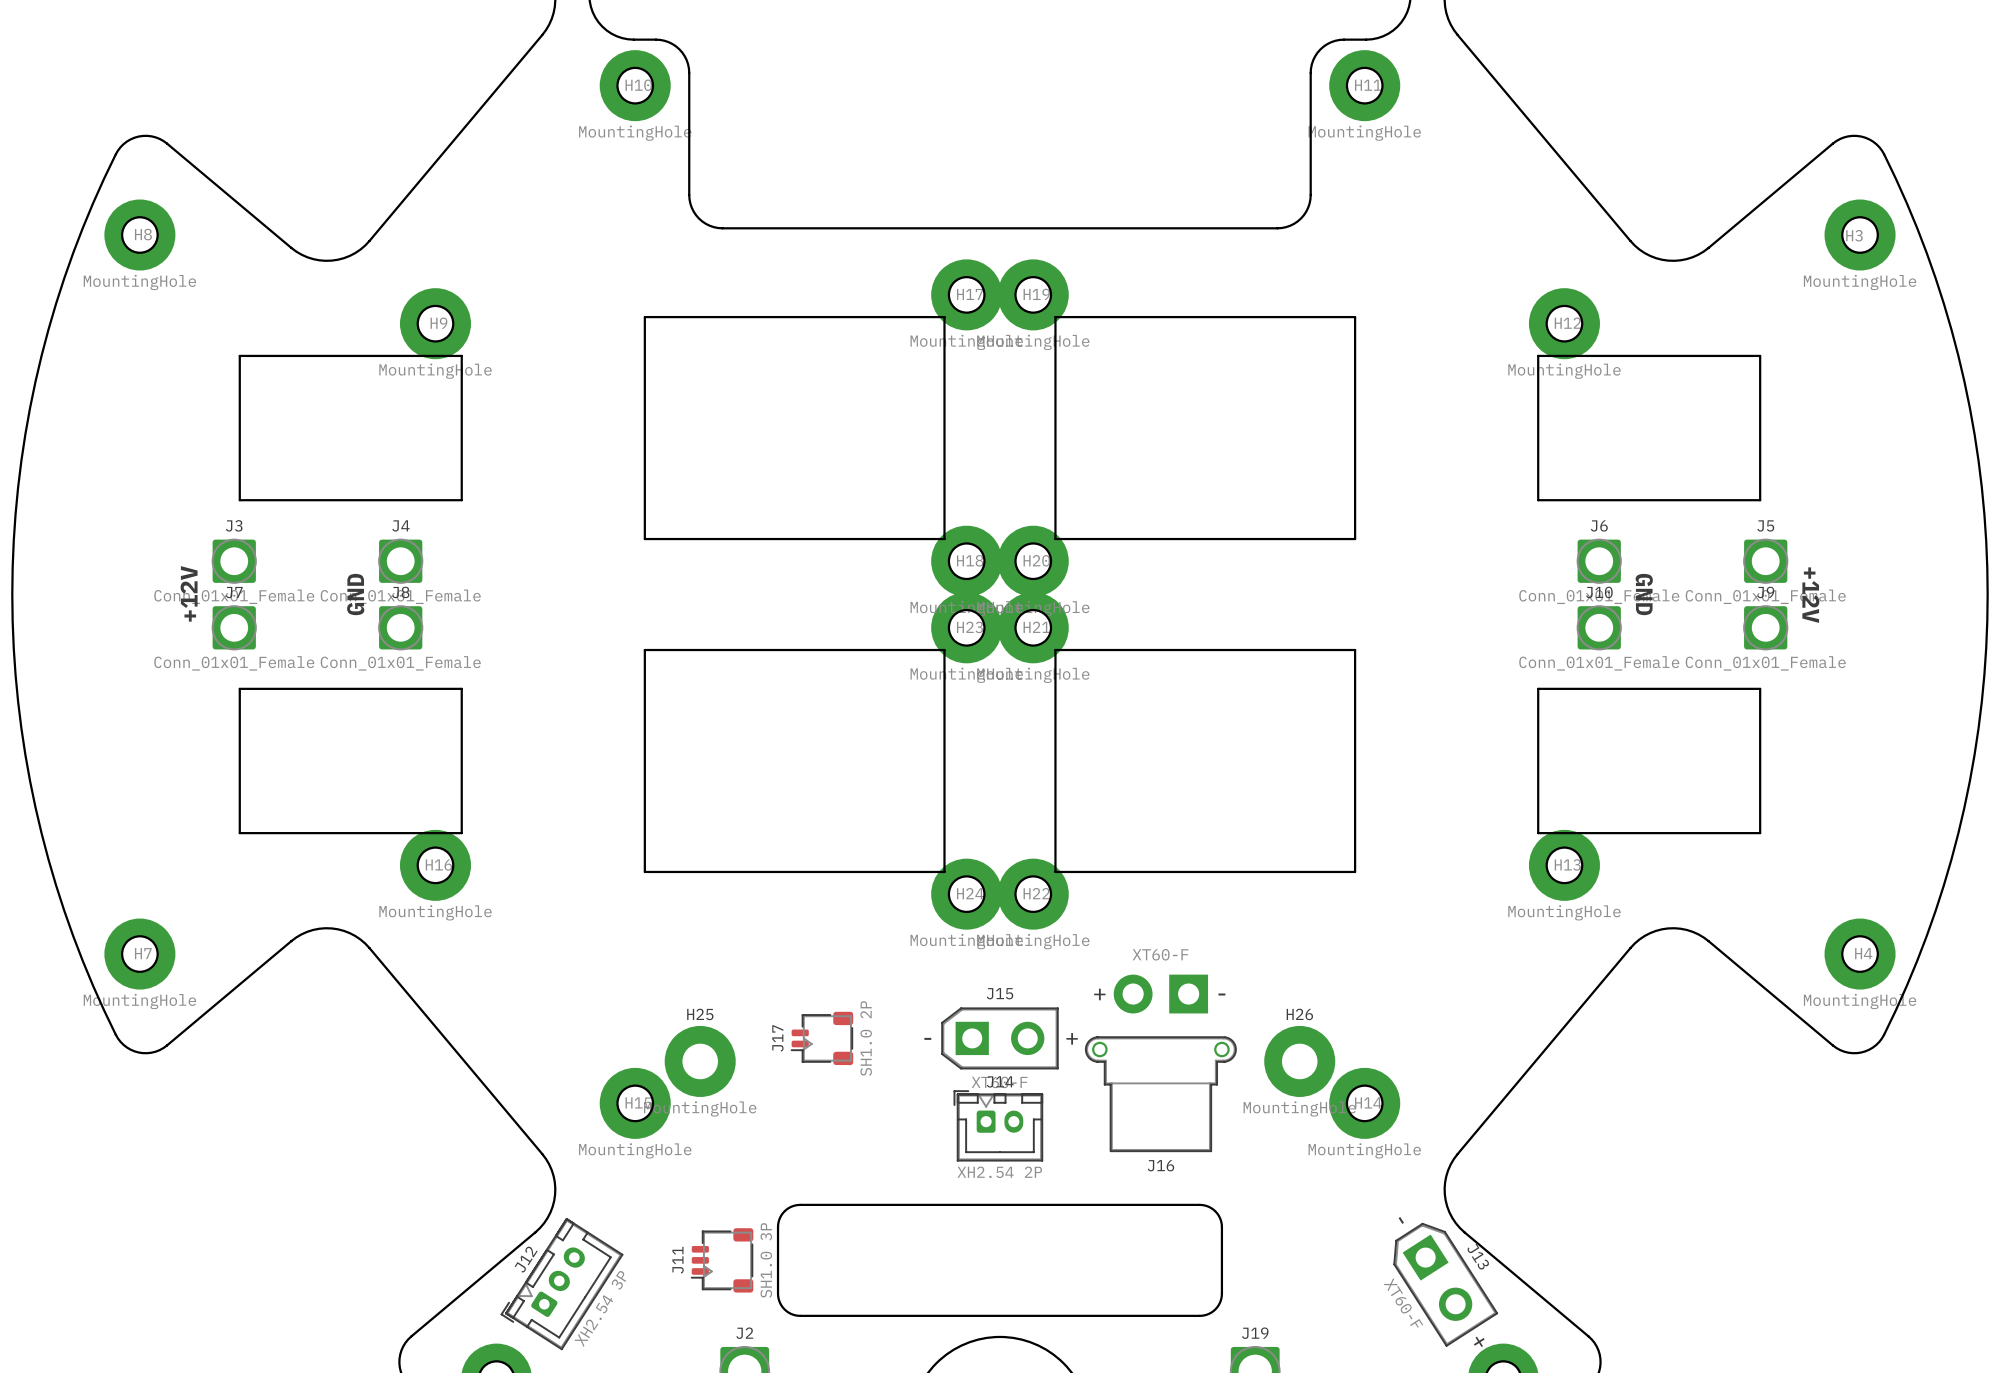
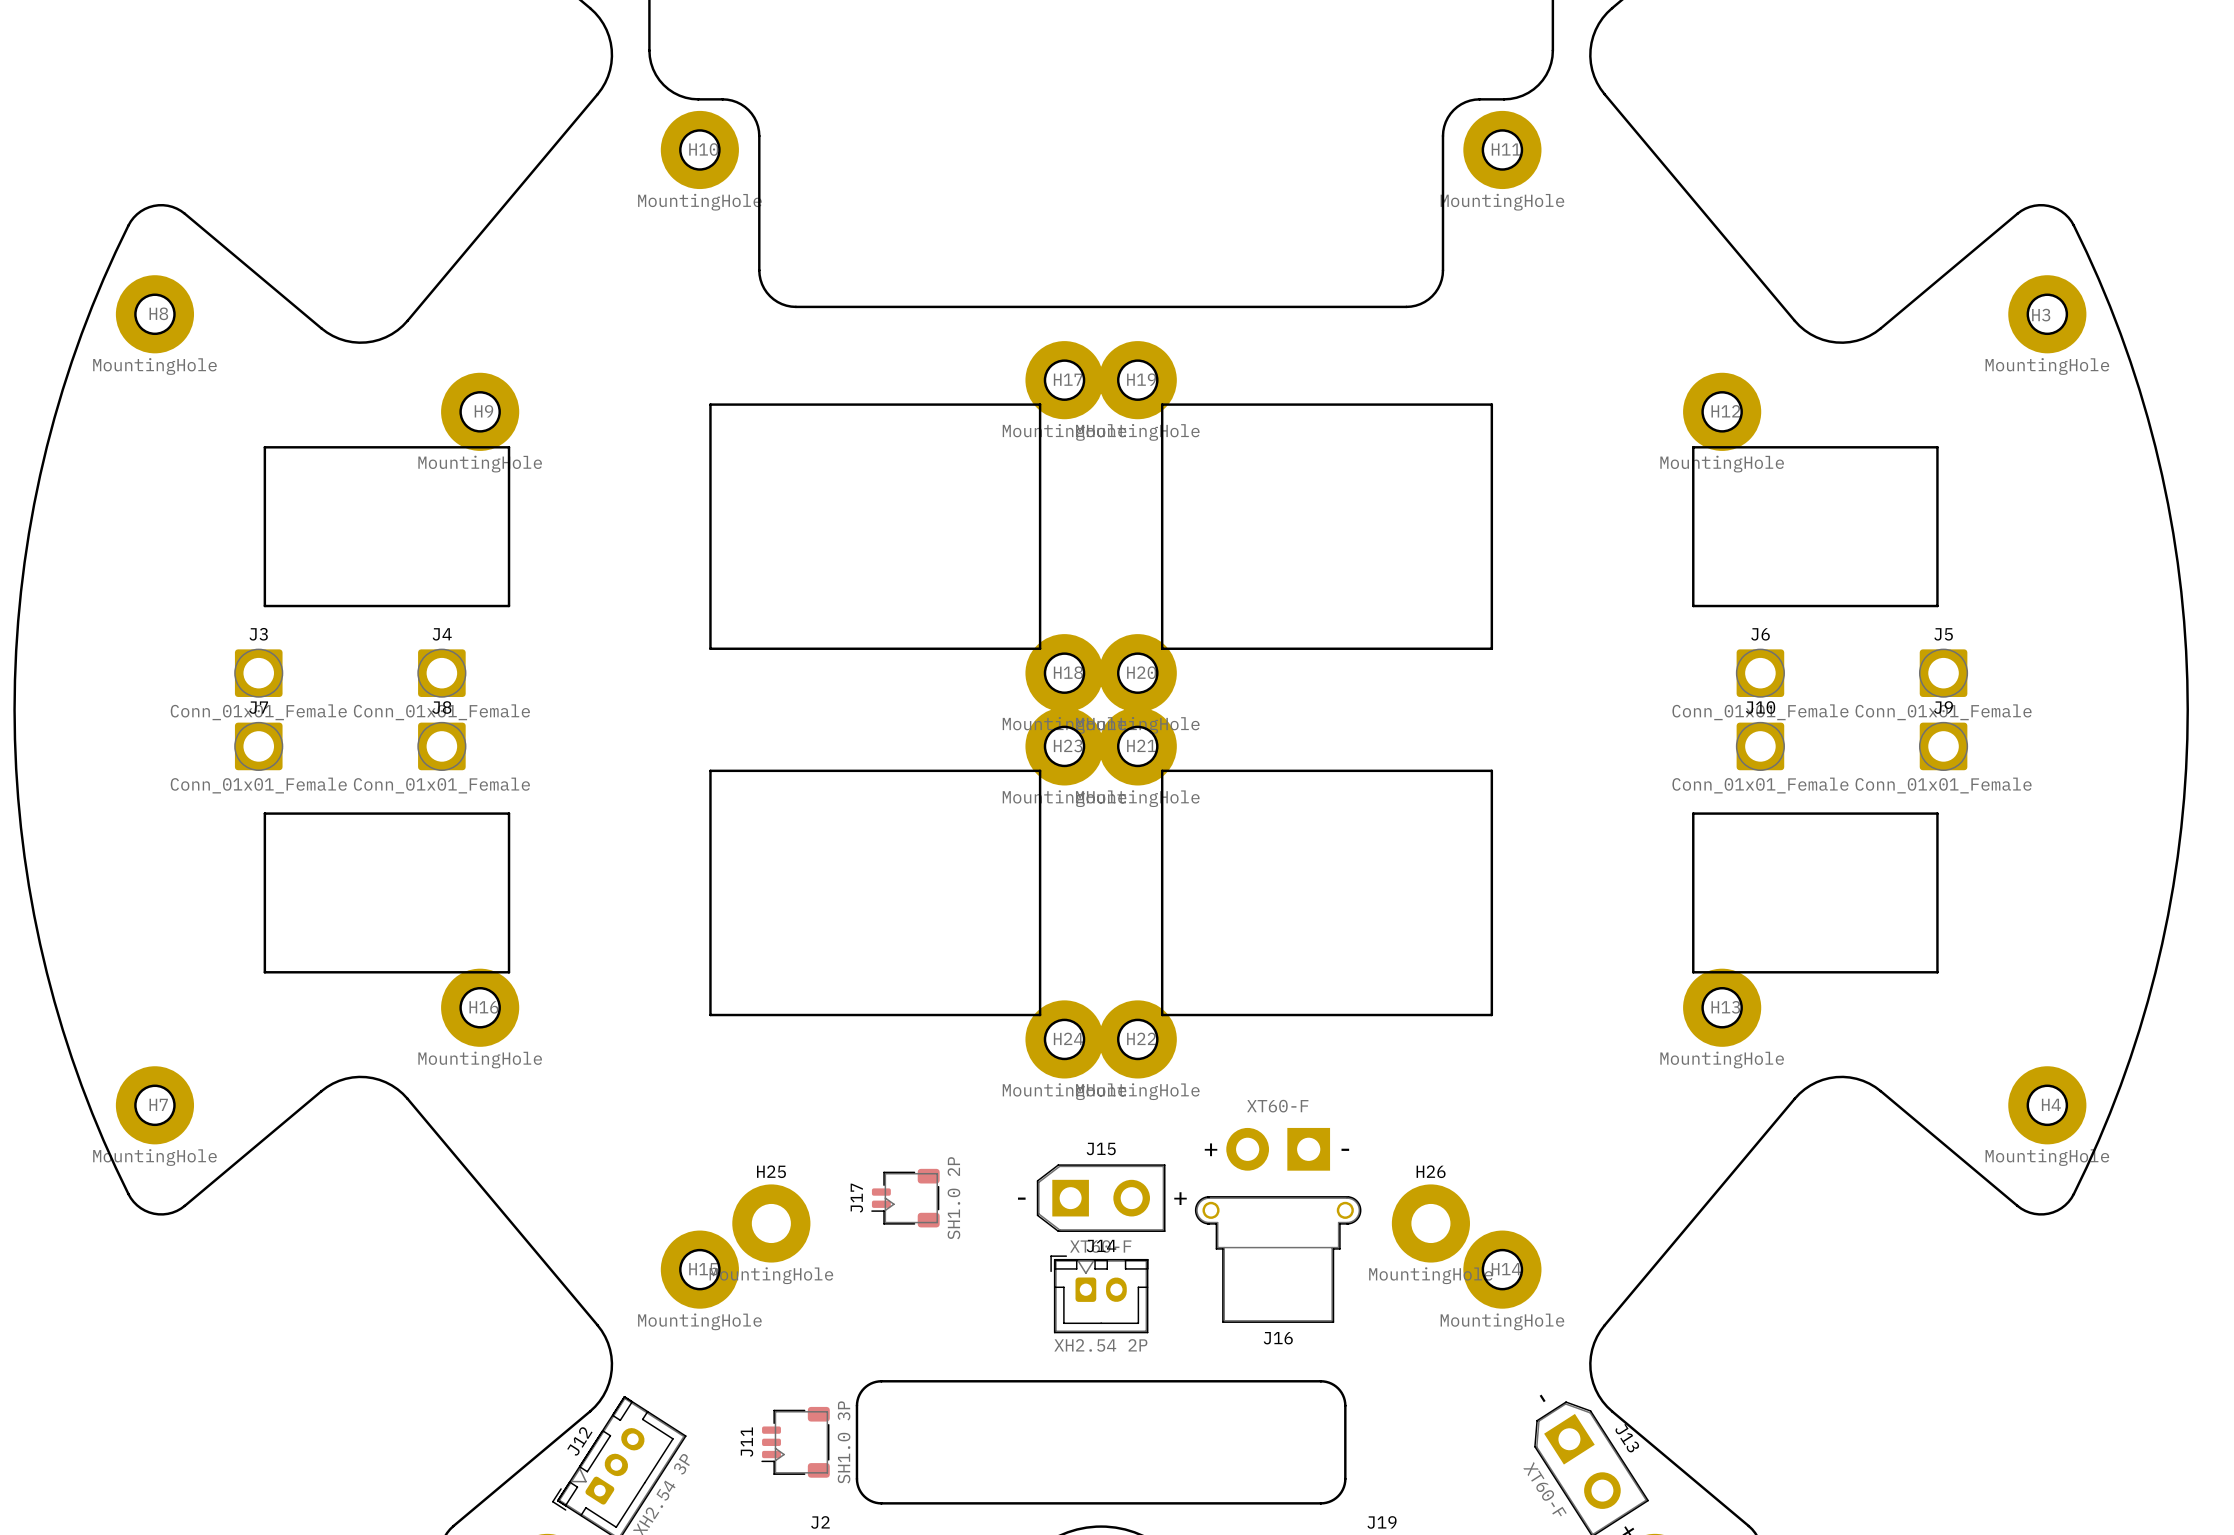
text: +12V (189, 593) -> none
text: GND (355, 594) -> none
text: GND (1644, 594) -> none
text: +12V (1810, 595) -> none

